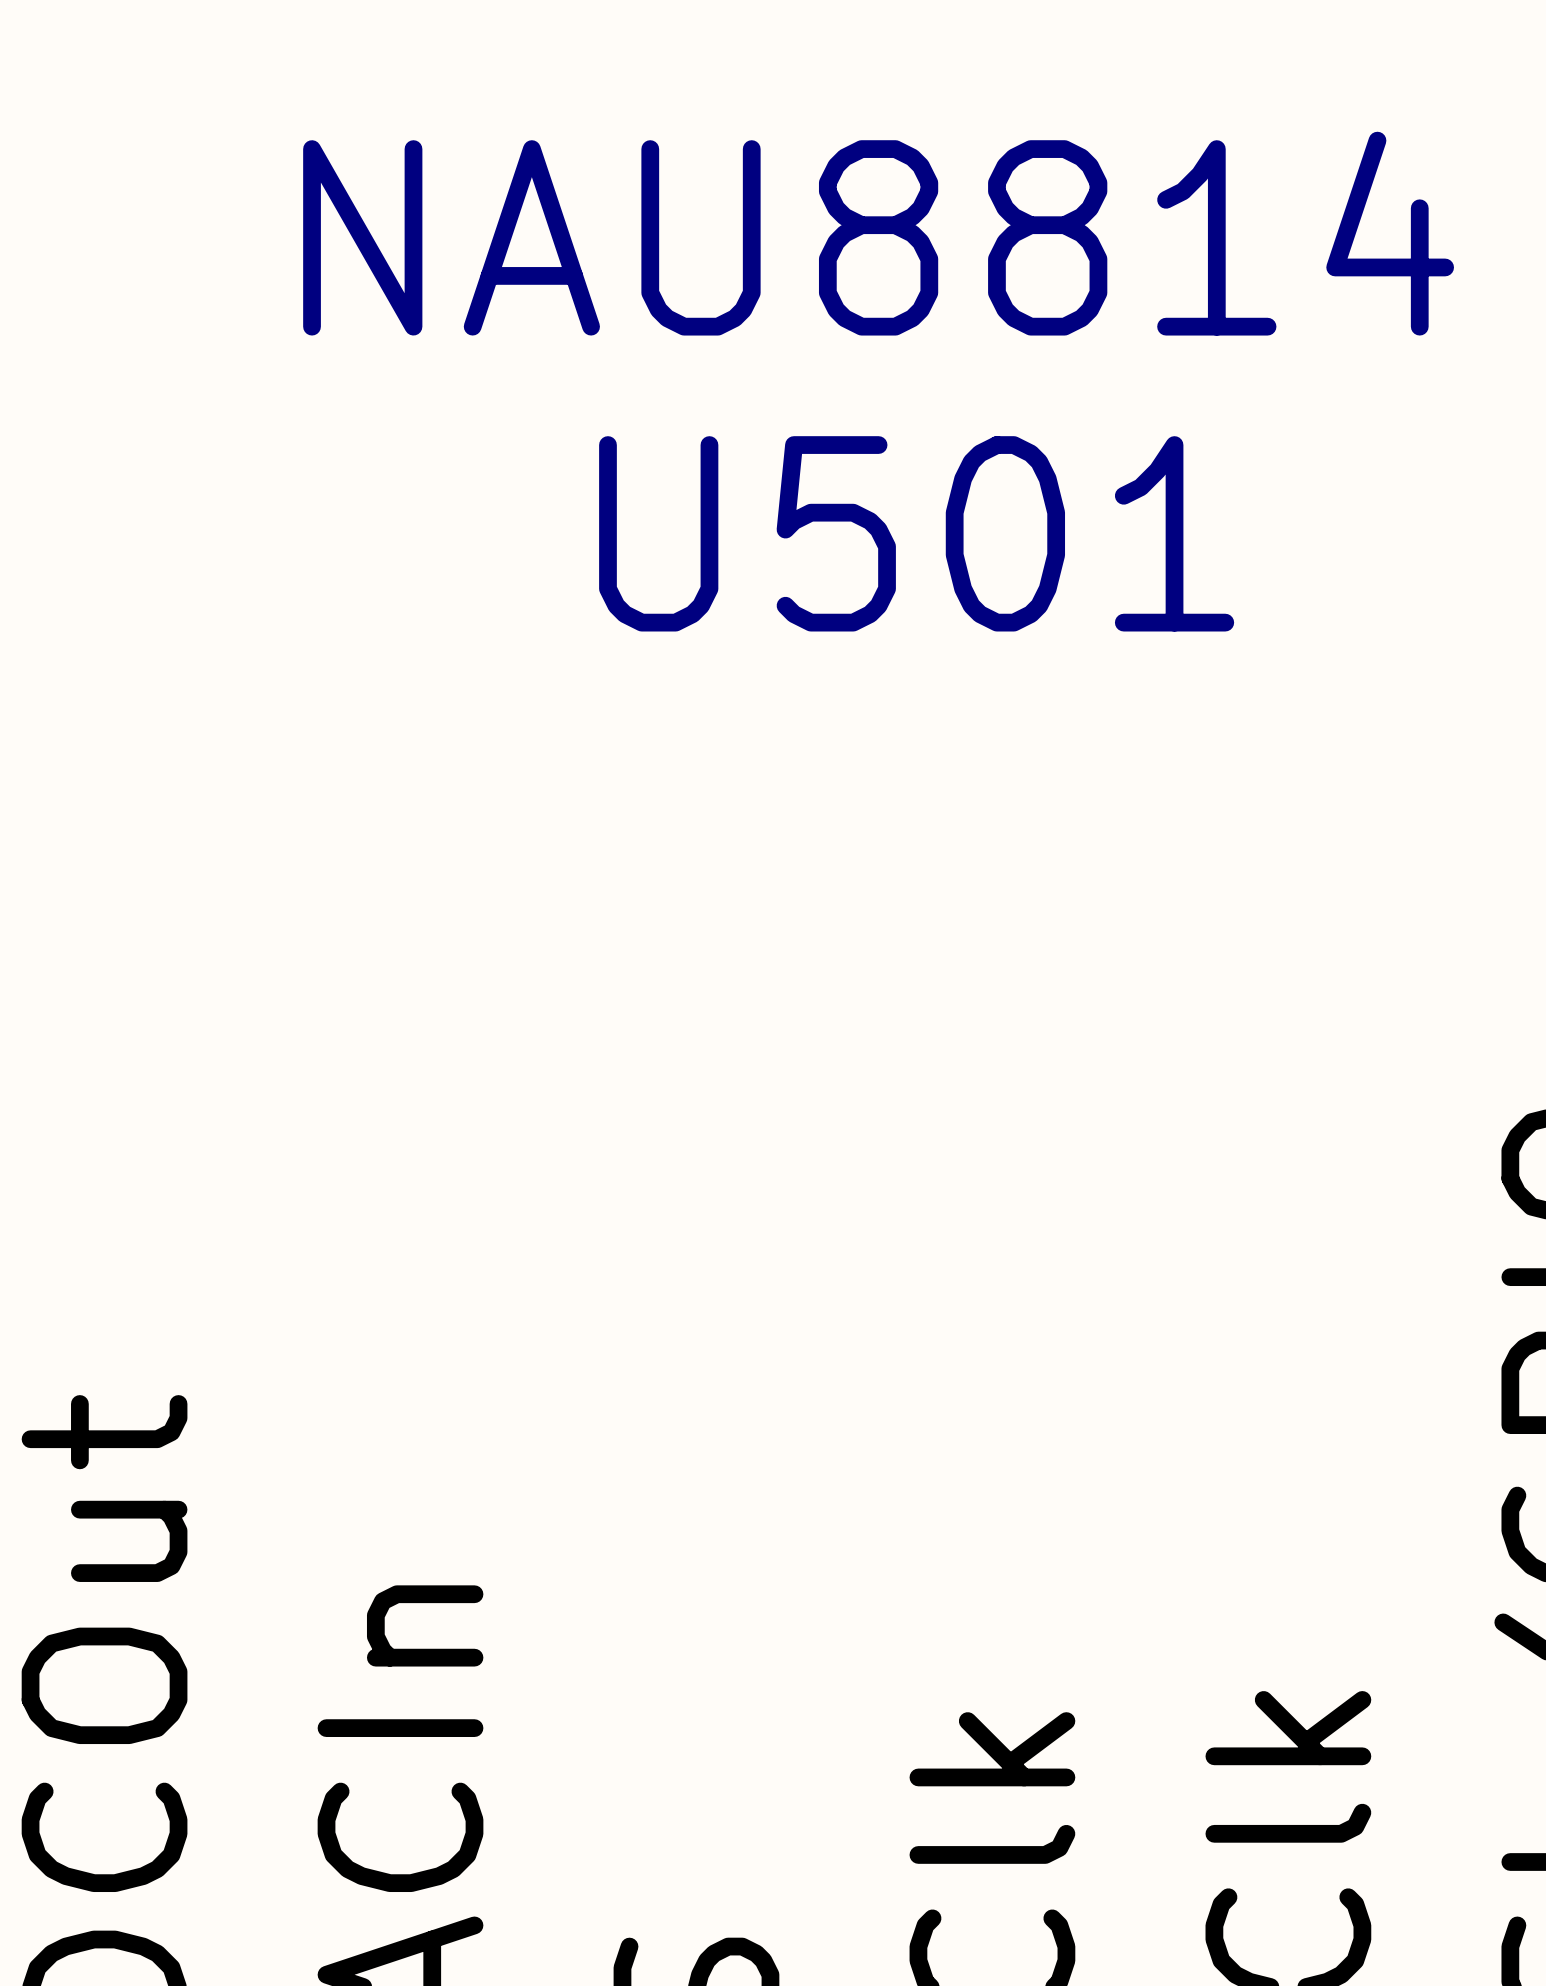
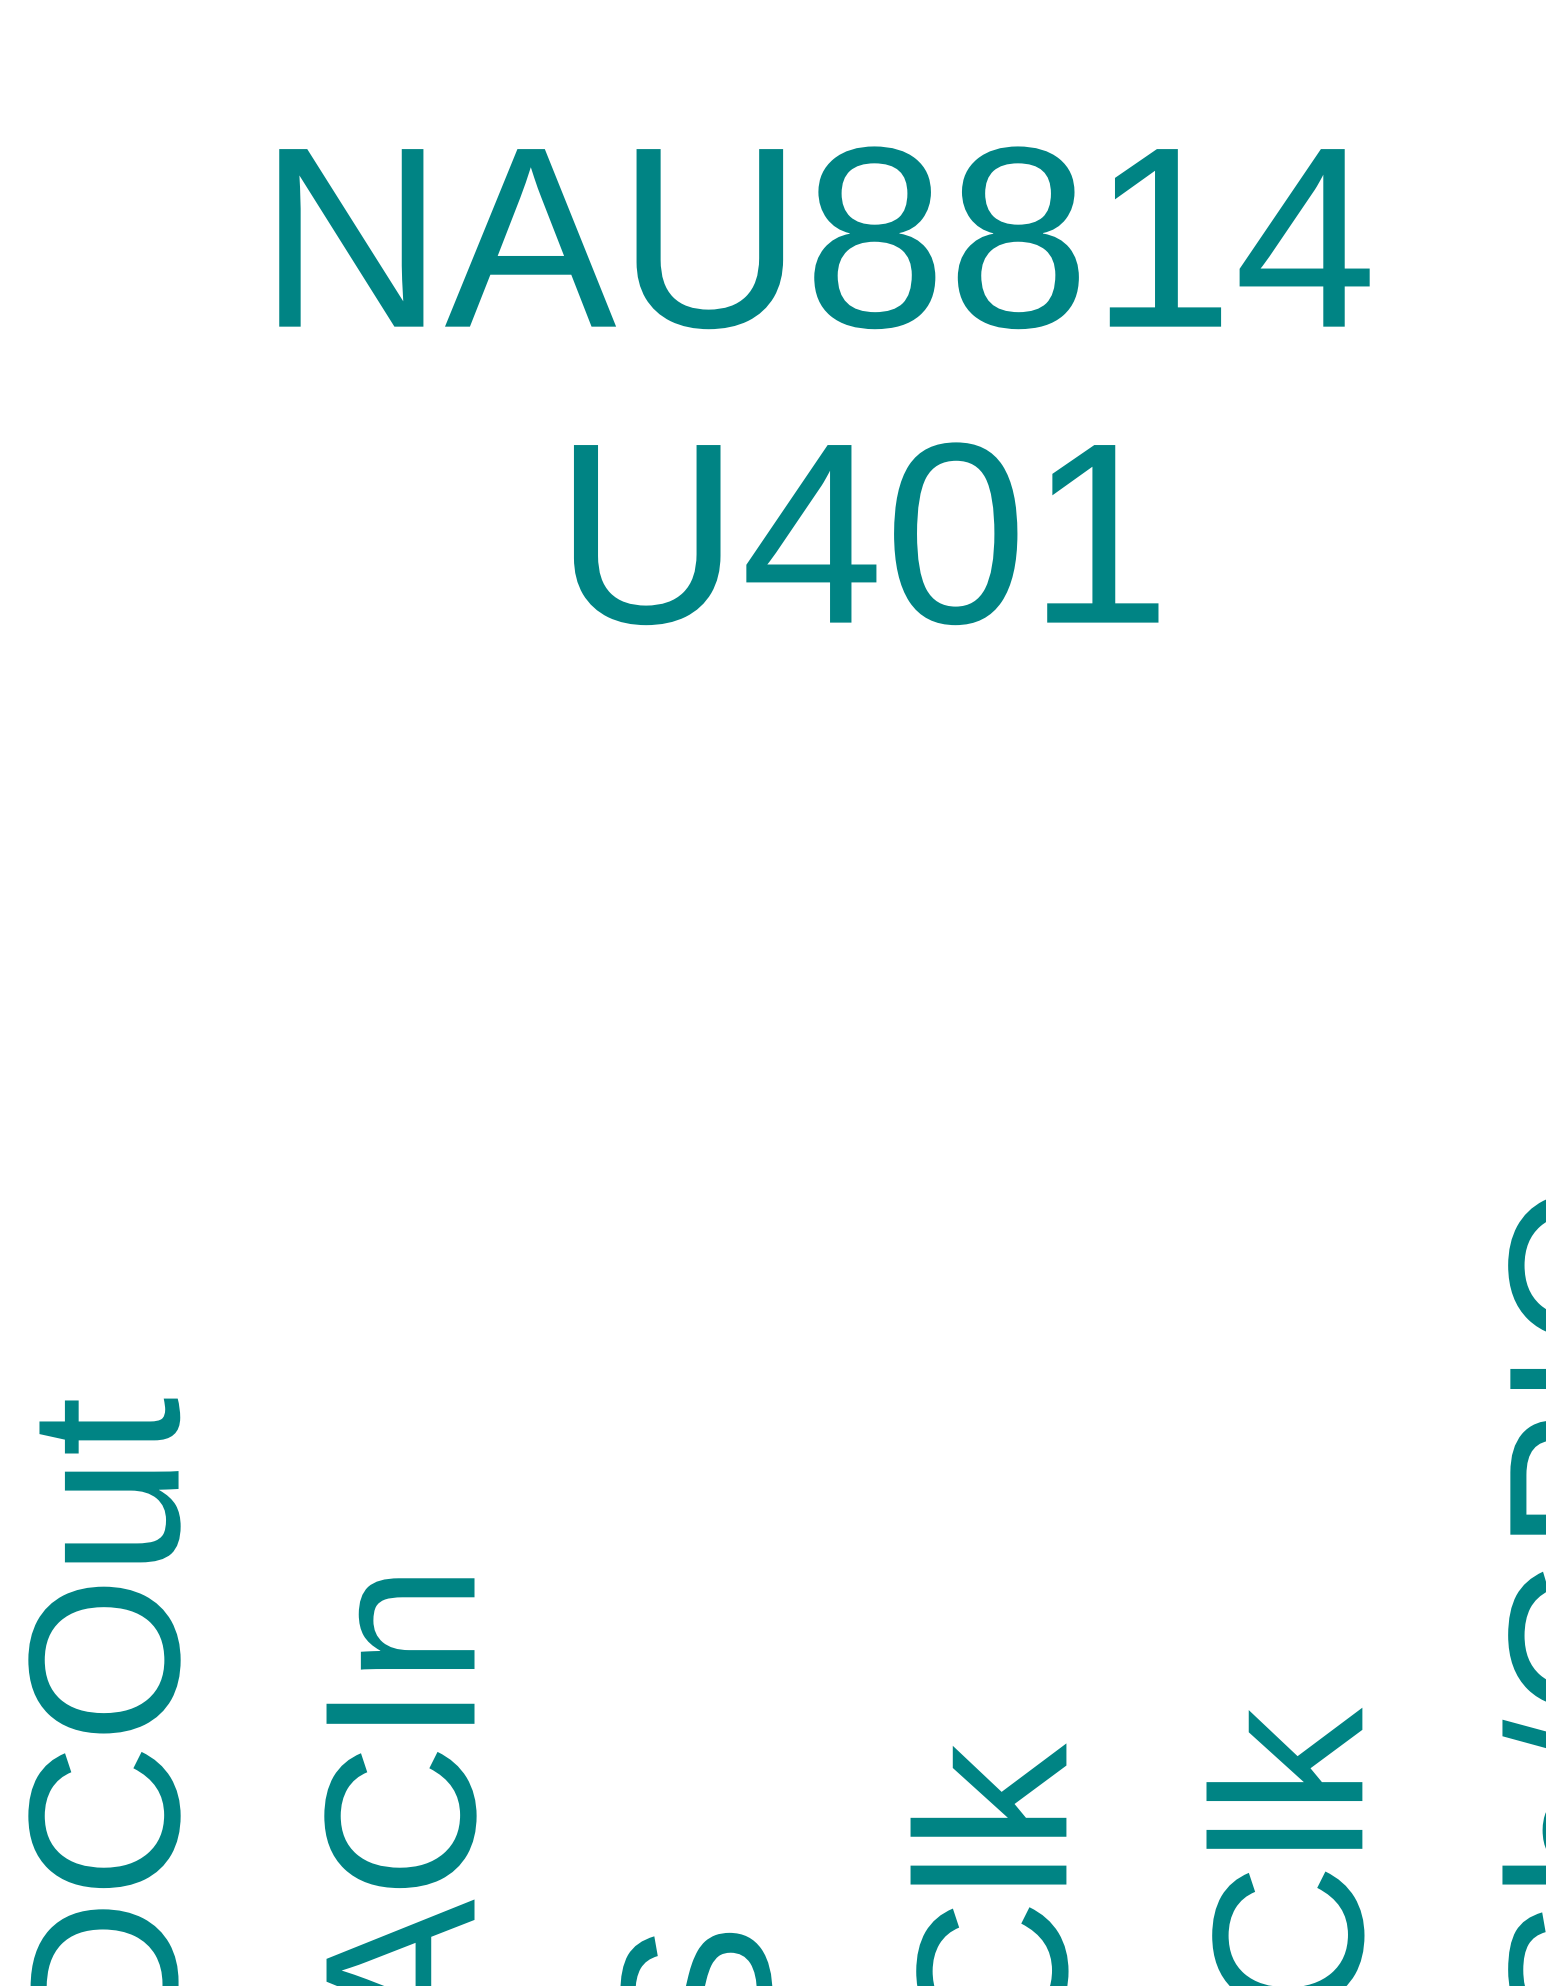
U501 name: U501 (916, 533) -> U401 (866, 533)

